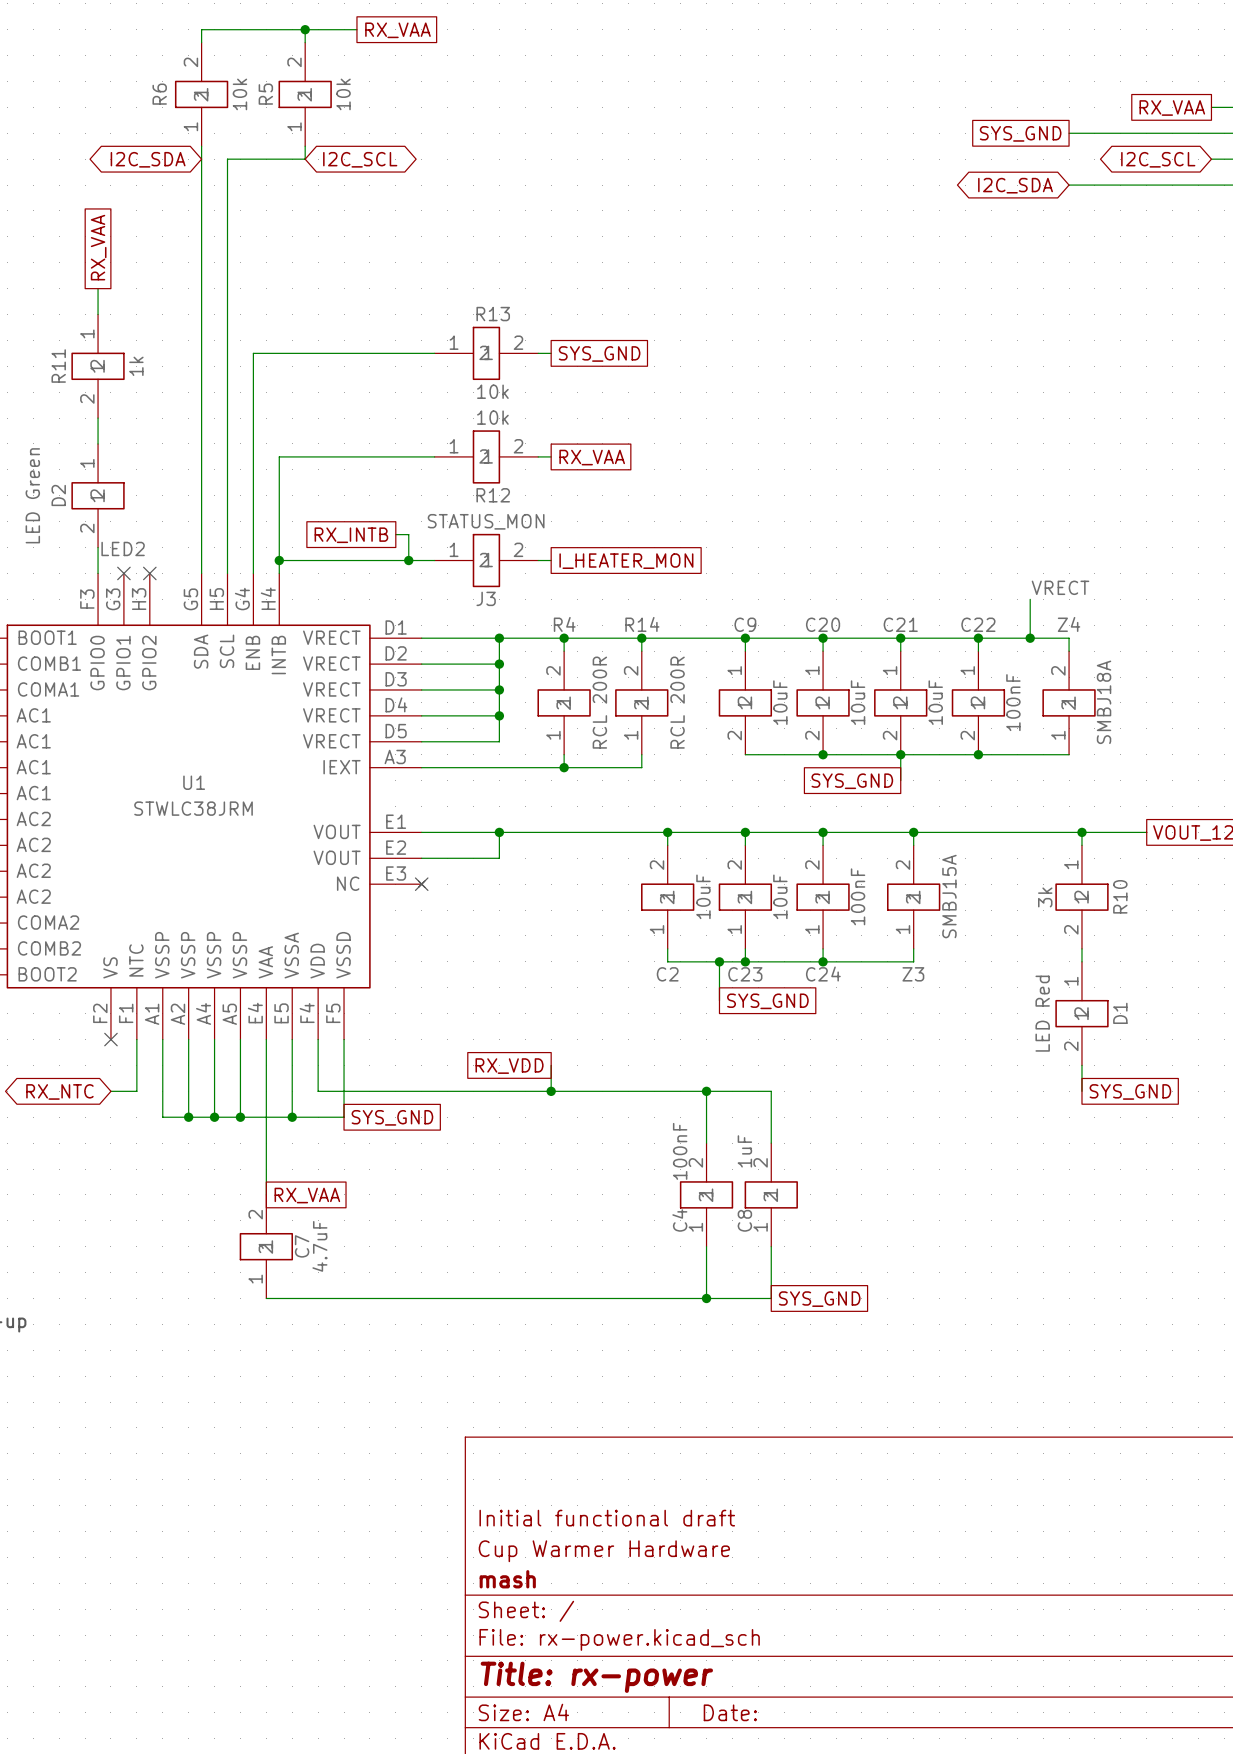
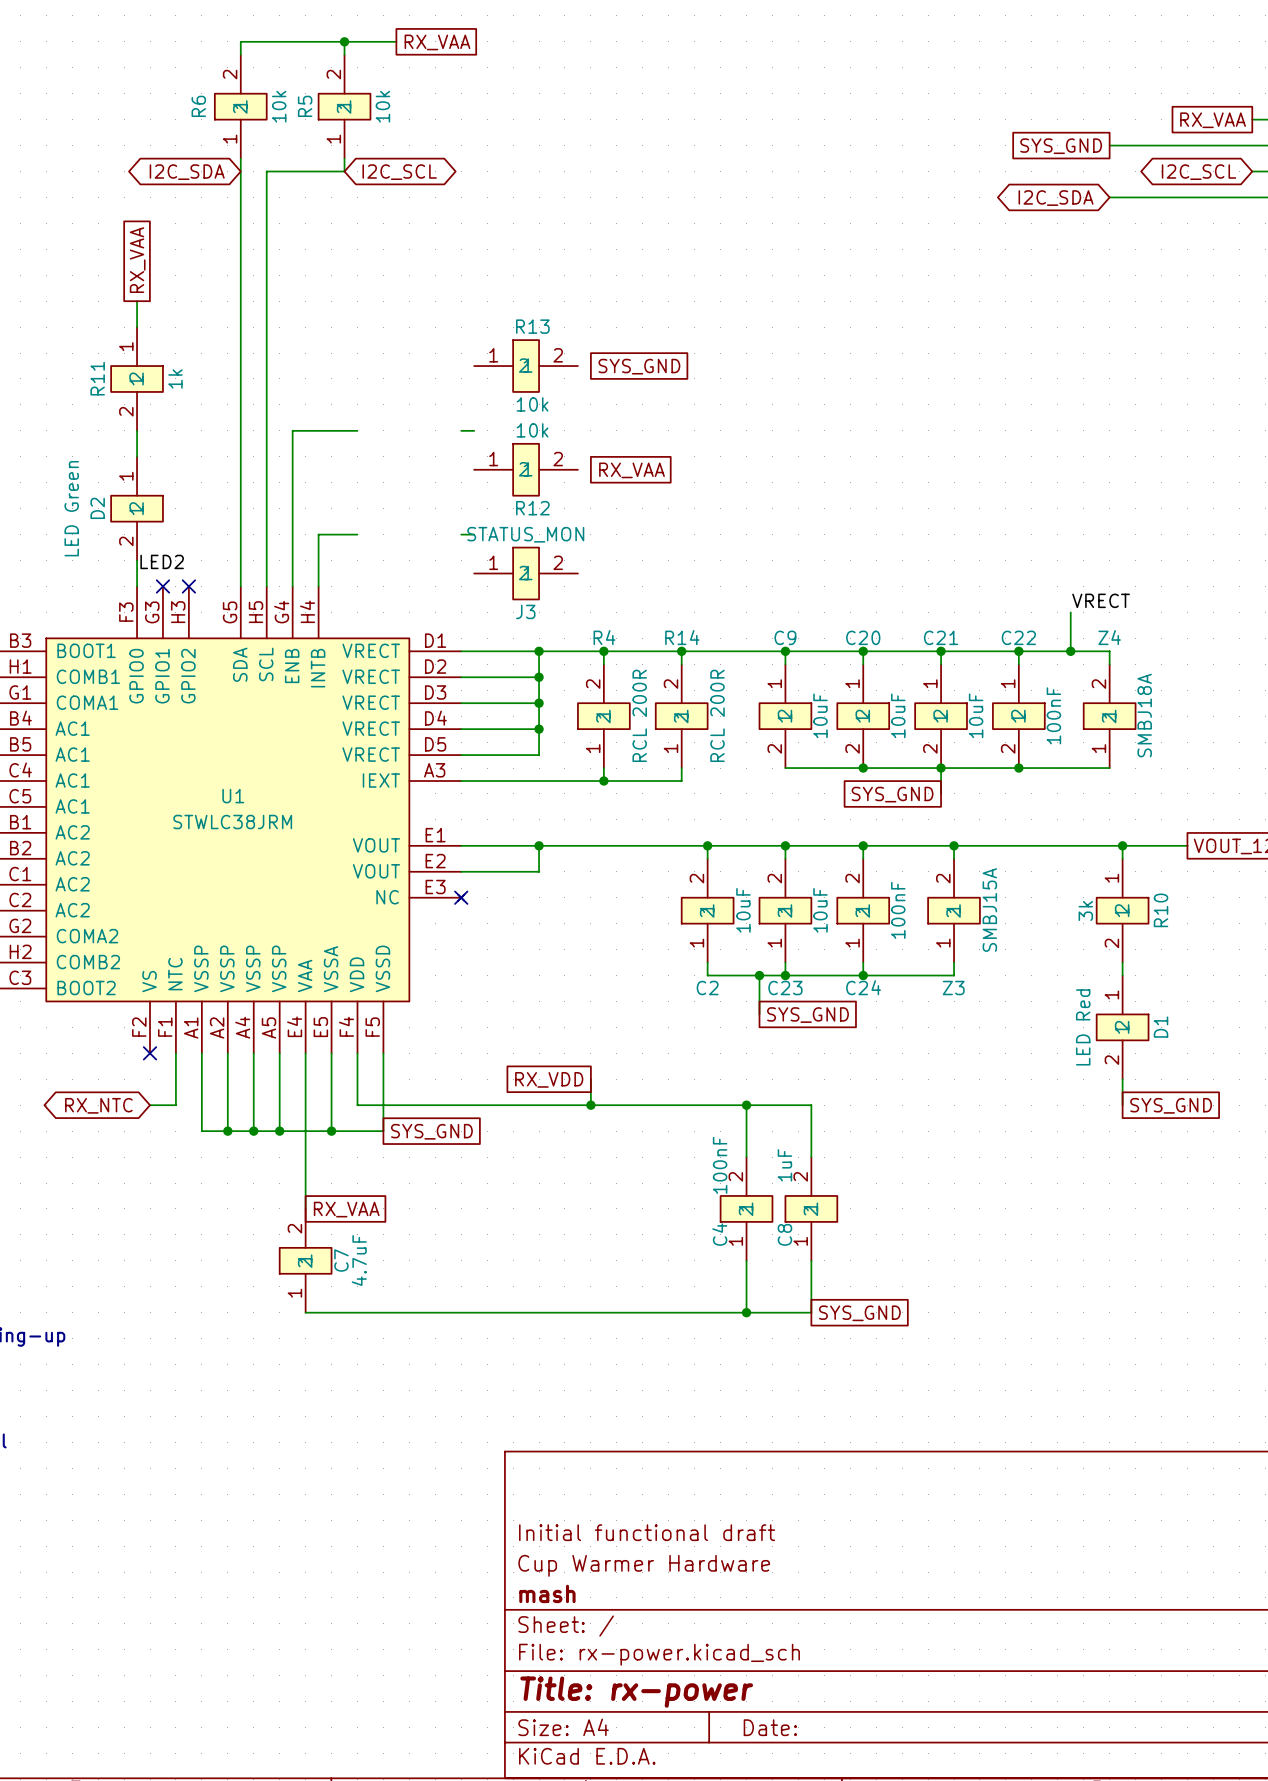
wire: (434, 353) (253, 353) (253, 418) -> (357, 430) (292, 430)
wire: (538, 353) (551, 353) -> none
wire: (434, 456) (279, 456) (279, 521) -> (357, 534) (318, 534)
wire: (538, 456) (551, 456) -> (461, 430) (474, 430)
wire: (395, 534) (408, 534) (408, 560) -> none
global label: RX_INTB (351, 535) -> none
wire: (279, 560) (434, 560) -> none
junction: (279, 560) -> none
junction: (408, 560) -> none
wire: (538, 560) (551, 560) -> (461, 534) (474, 534)
global label: I_HEATER_MON (626, 561) -> none

